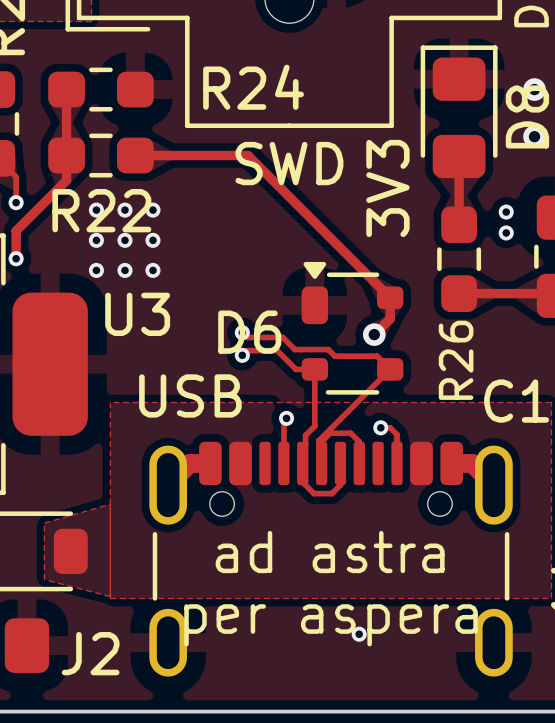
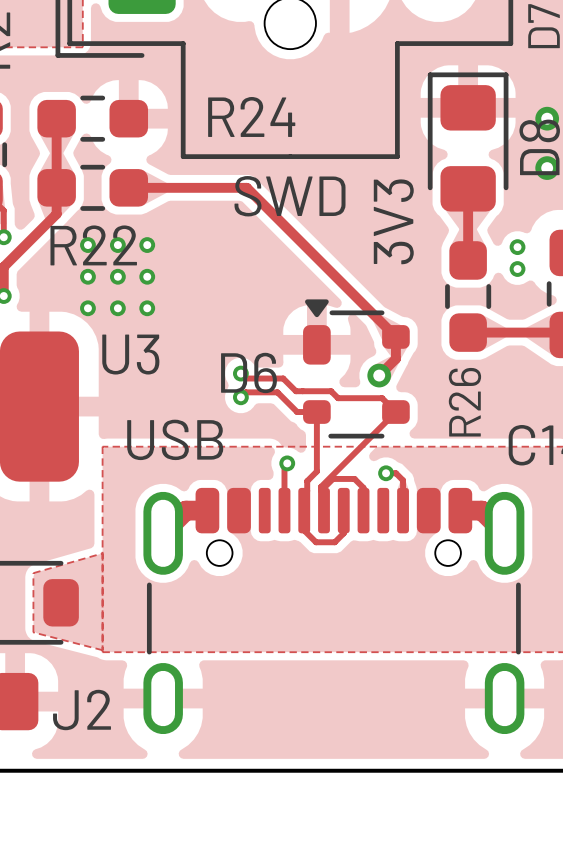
text: ad astra (330, 552) -> none
text: per aspera (331, 625) -> none
via: (359, 634) -> none

